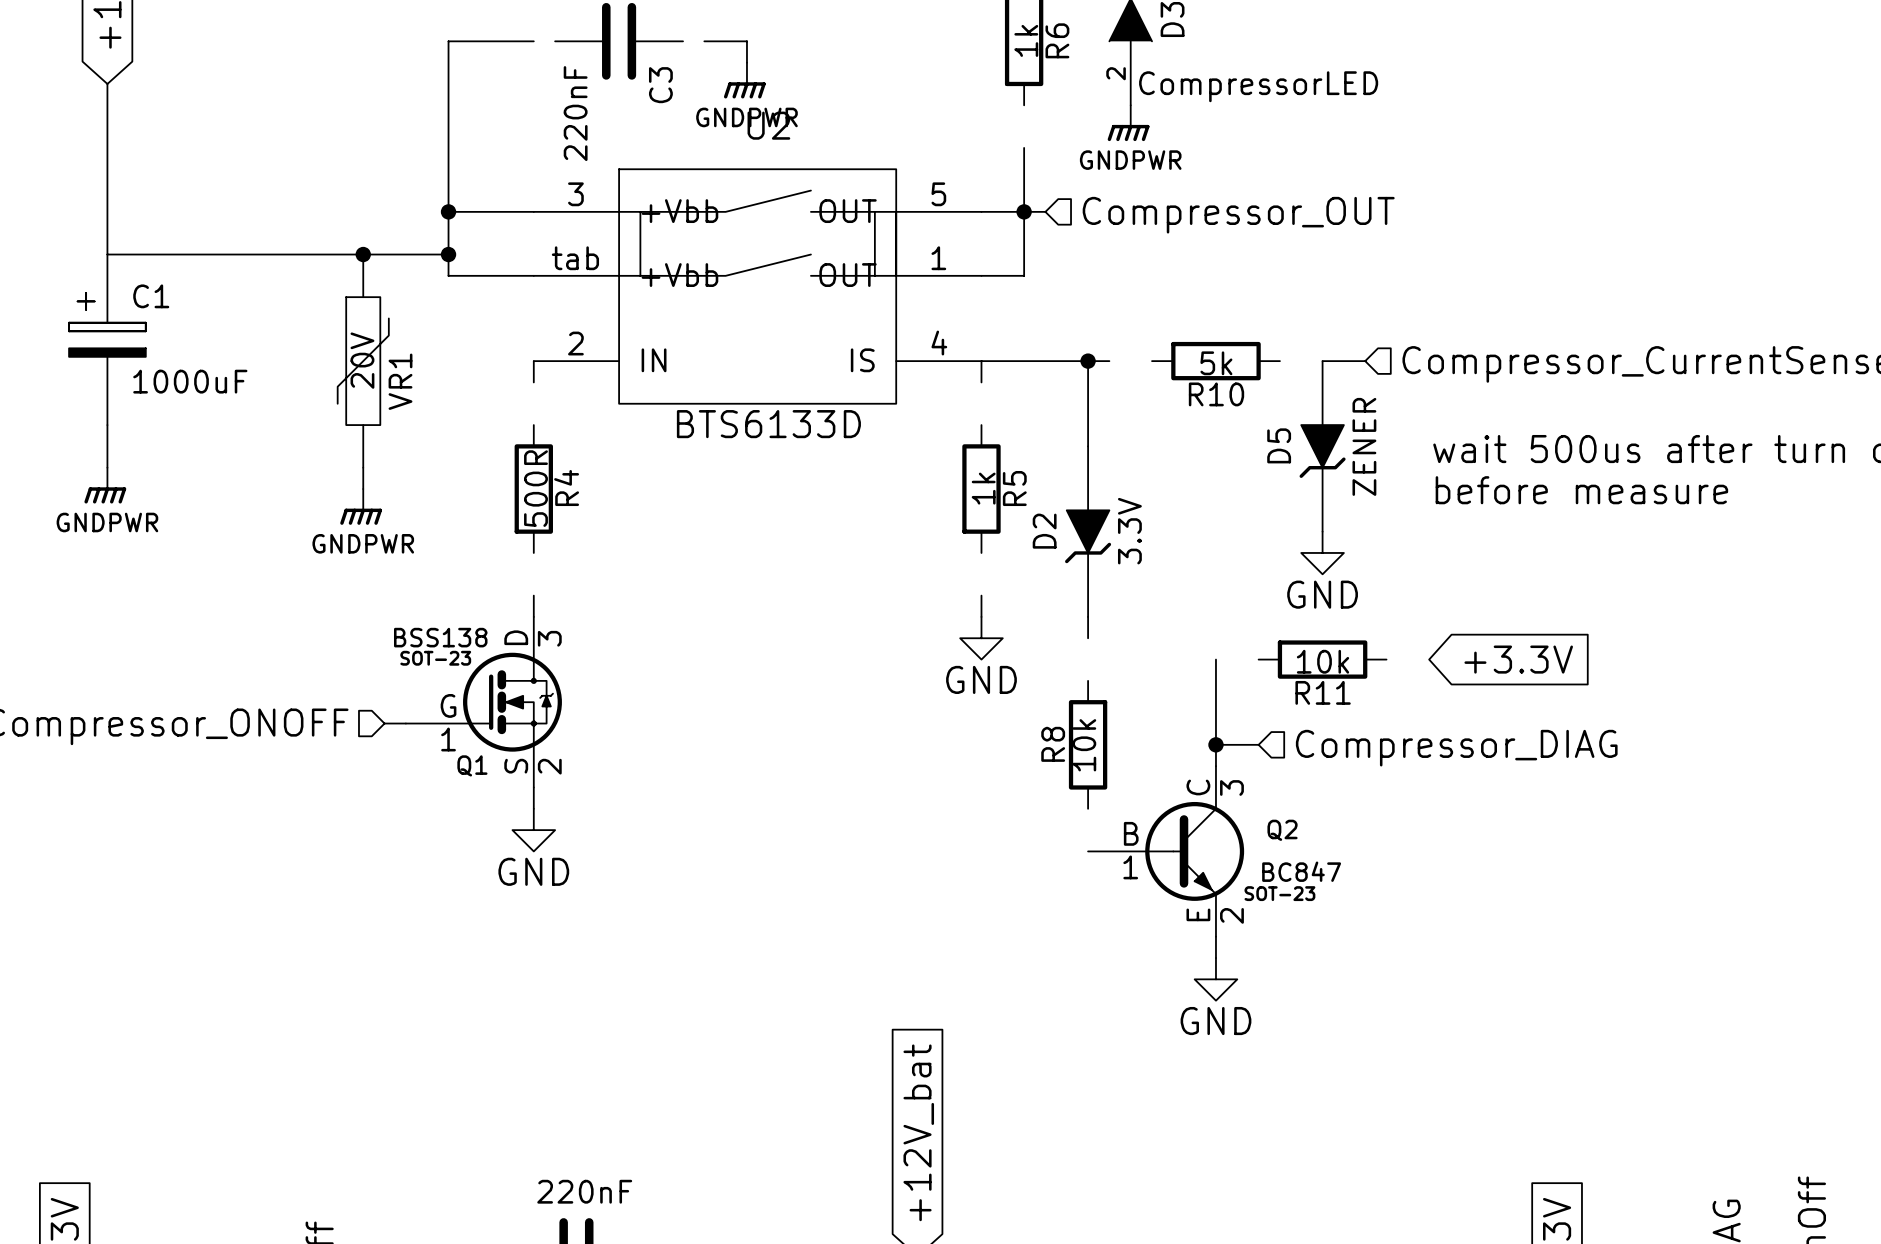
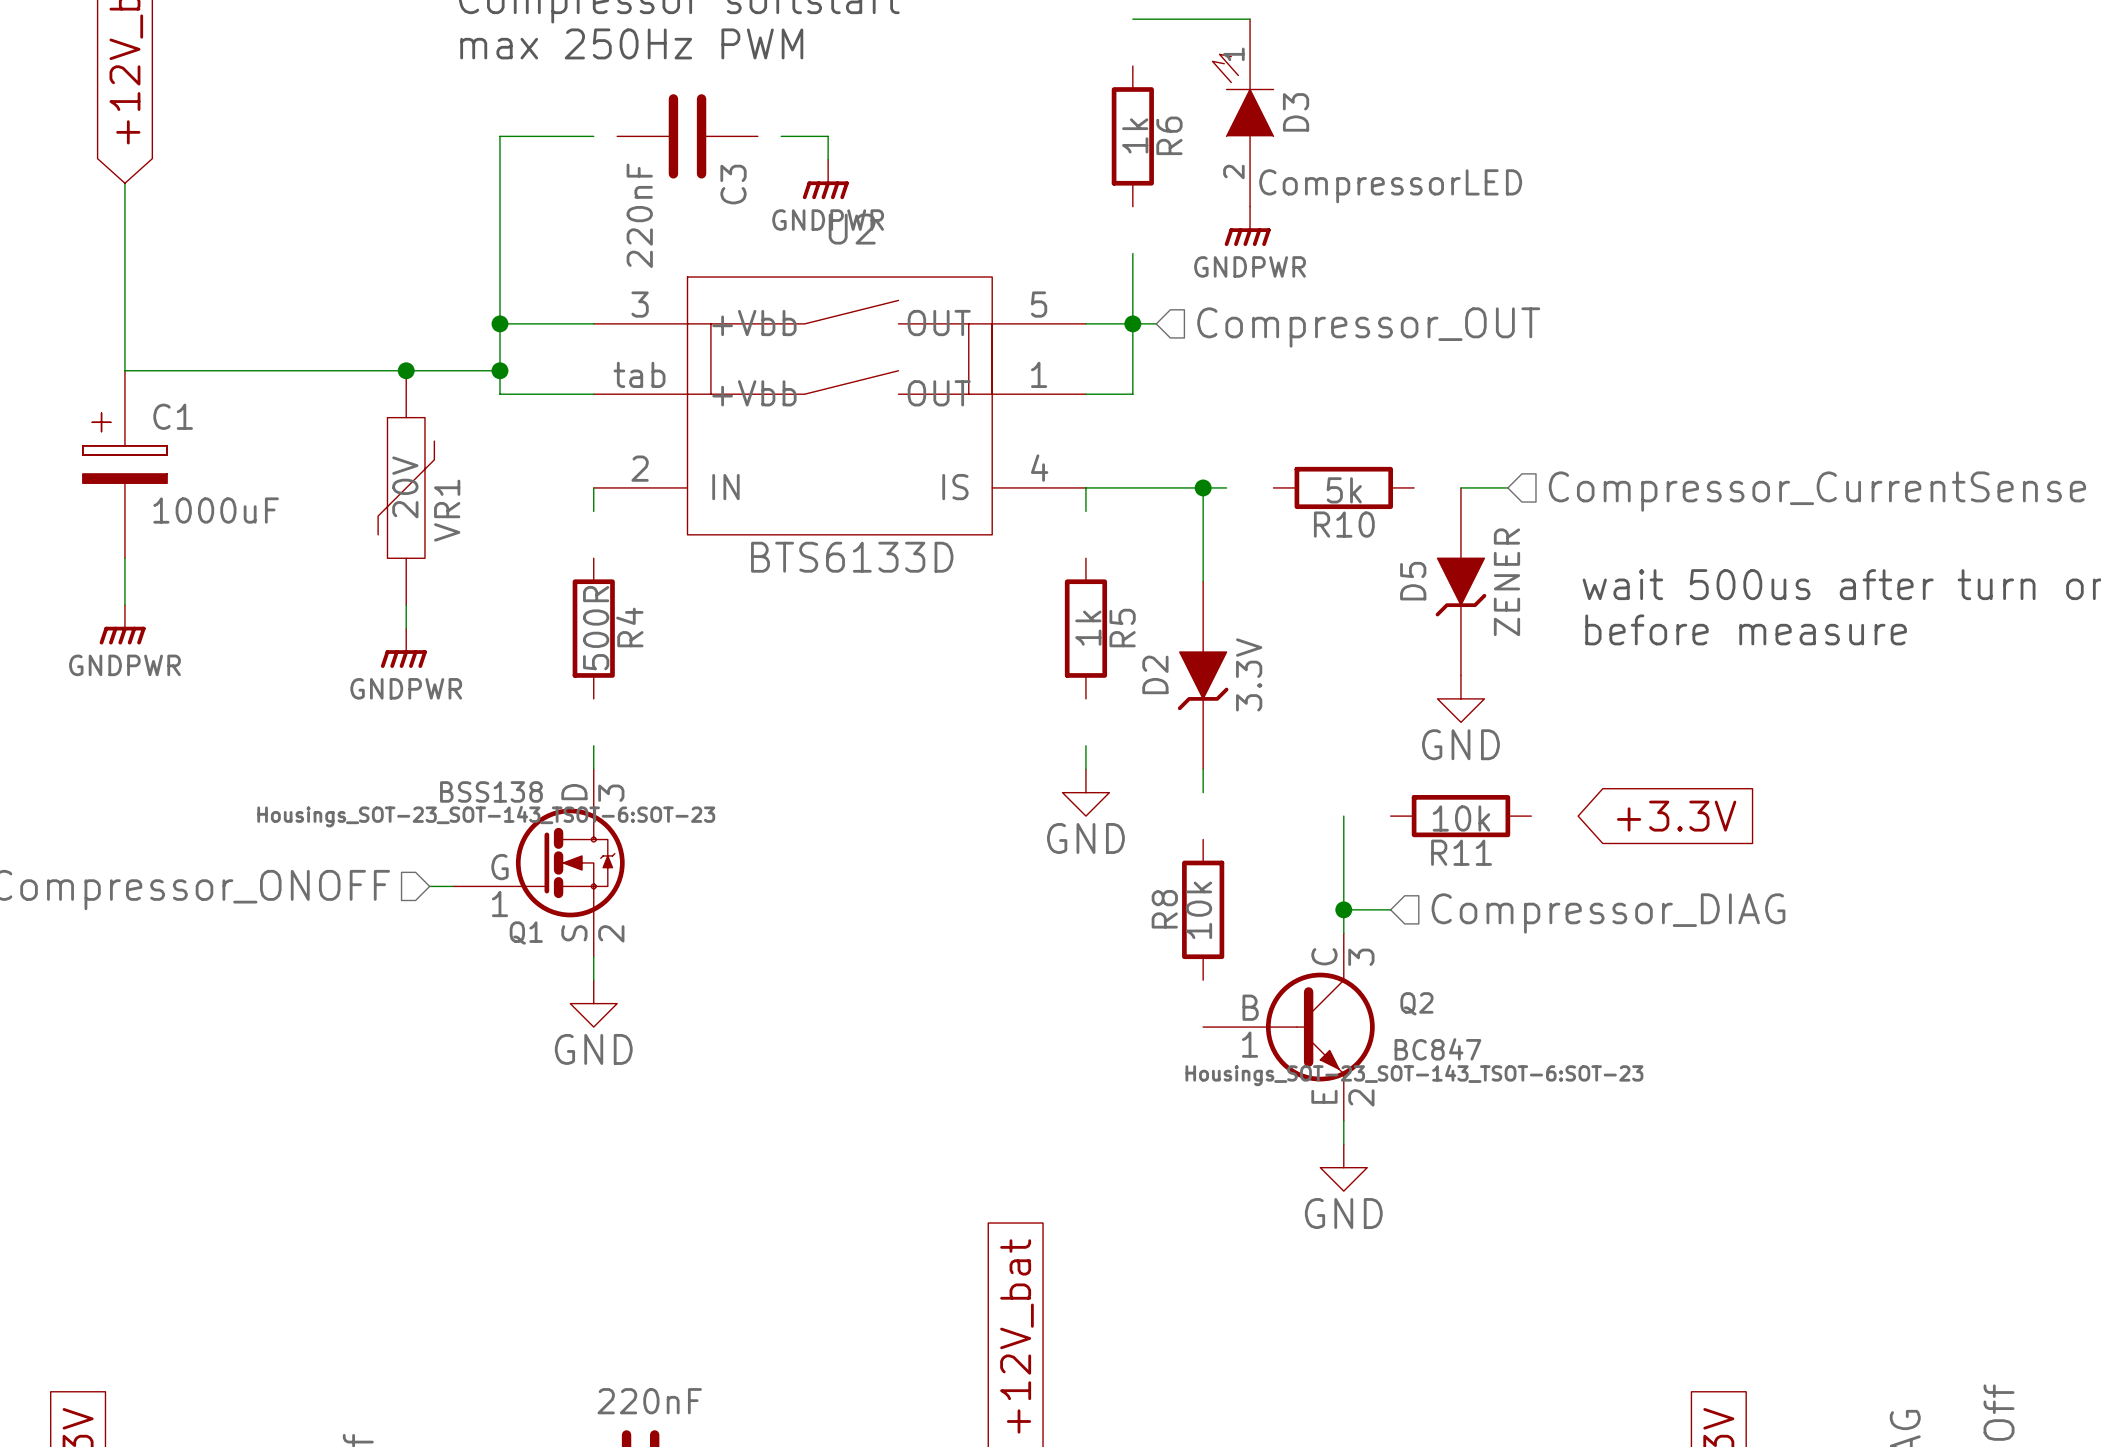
Q1 text: SOT-23 (435, 658) -> Housings_SOT-23_SOT-143_TSOT-6:SOT-23 (486, 816)
Q2 text: SOT-23 (1279, 893) -> Housings_SOT-23_SOT-143_TSOT-6:SOT-23 (1414, 1075)

